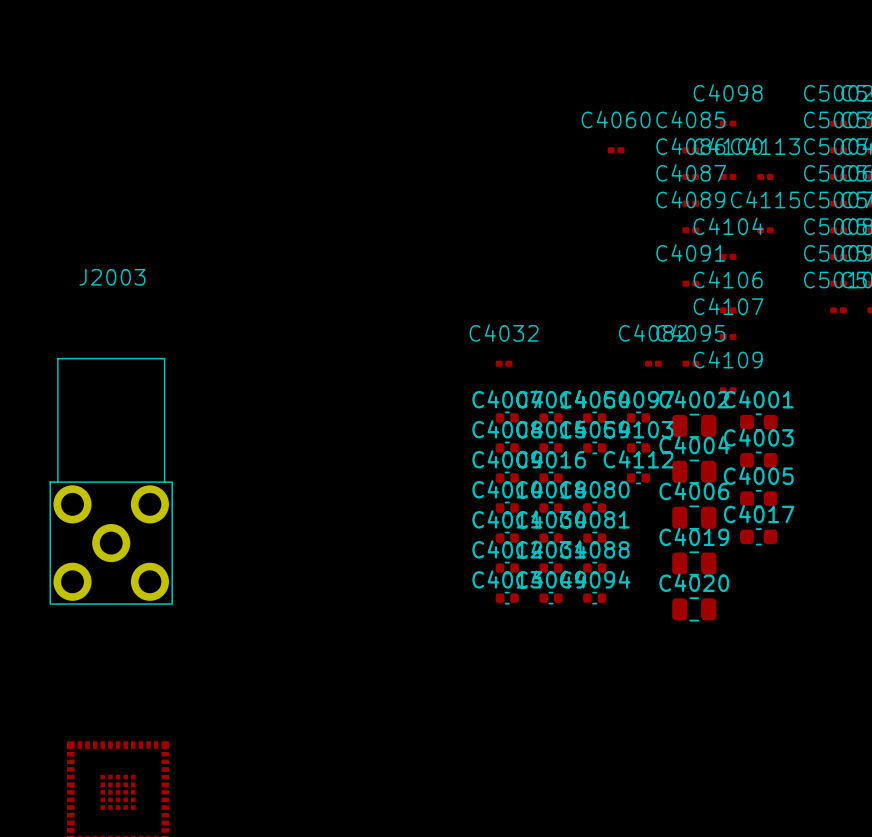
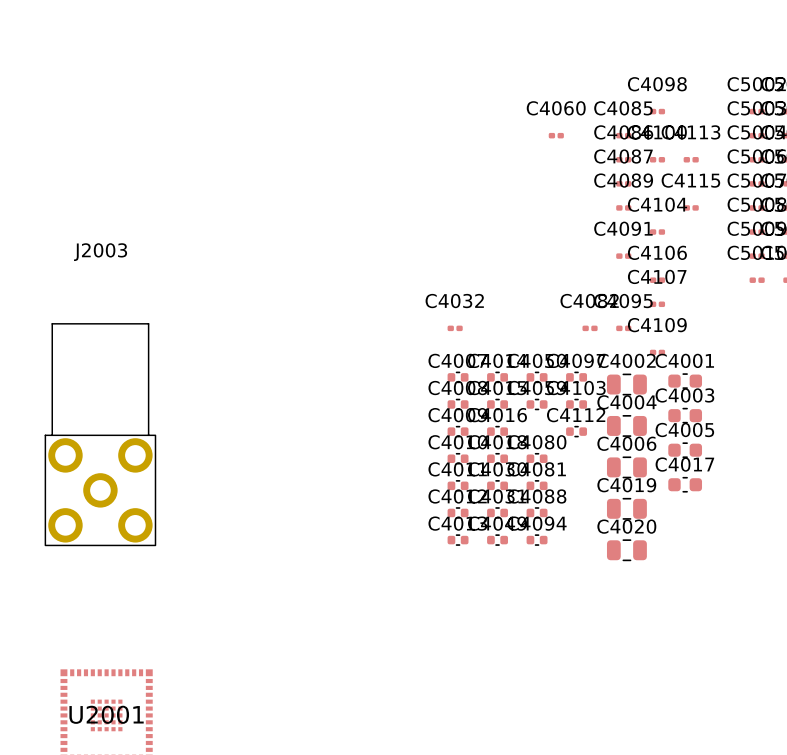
U2001 name: none -> U2001 (106, 714)

